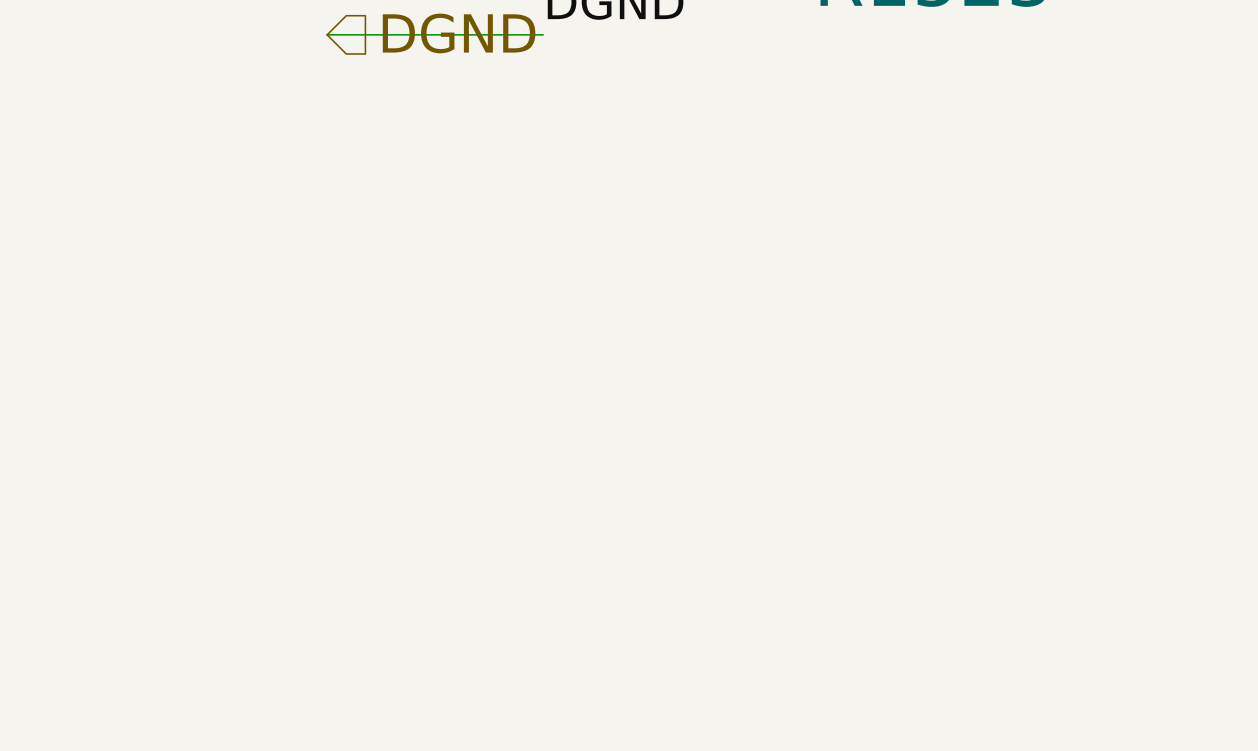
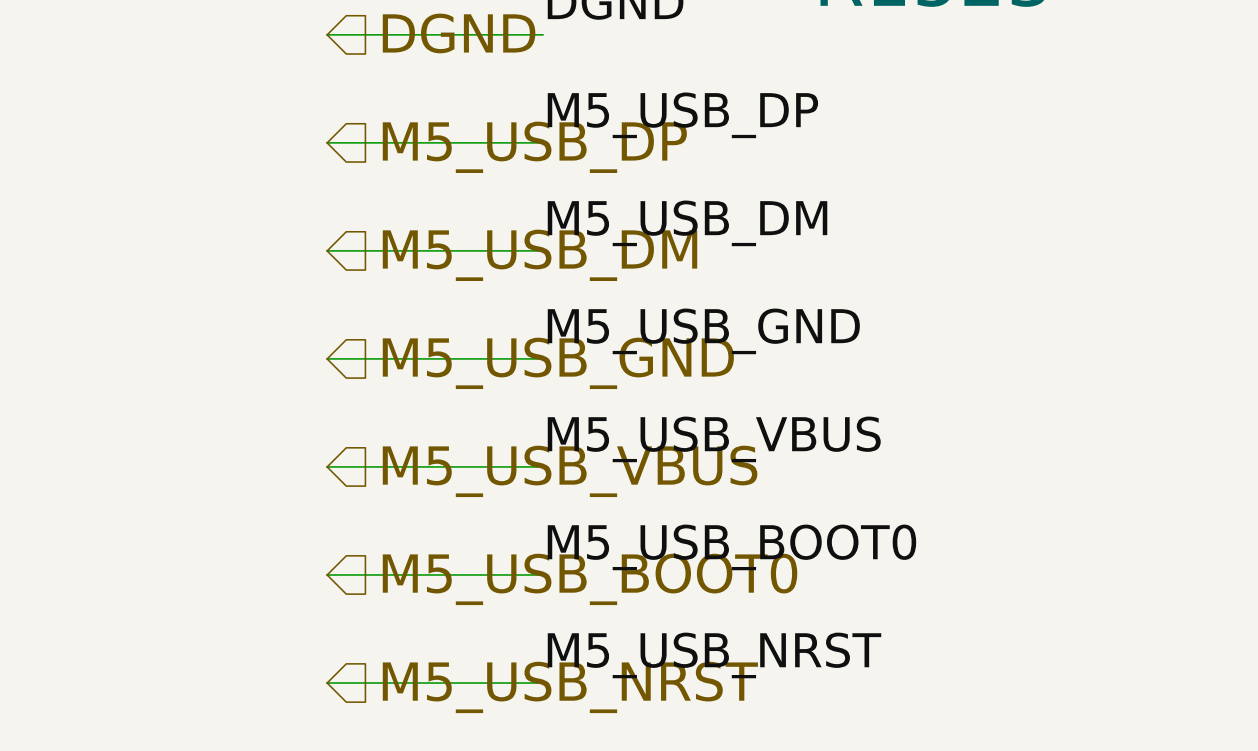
label: none -> M5_USB_DP (682, 115)
wire: none -> (327, 142) (543, 142)
hierarchical label: none -> M5_USB_DP (534, 147)
label: none -> M5_USB_DM (687, 223)
wire: none -> (327, 250) (543, 250)
hierarchical label: none -> M5_USB_DM (540, 255)
label: none -> M5_USB_GND (703, 331)
wire: none -> (327, 358) (543, 358)
hierarchical label: none -> M5_USB_GND (558, 363)
label: none -> M5_USB_VBUS (714, 439)
wire: none -> (327, 466) (543, 466)
hierarchical label: none -> M5_USB_VBUS (570, 471)
label: none -> M5_USB_BOOT0 (731, 547)
wire: none -> (327, 574) (543, 574)
hierarchical label: none -> M5_USB_BOOT0 (590, 579)
label: none -> M5_USB_NRST (714, 655)
wire: none -> (327, 683) (543, 683)
hierarchical label: none -> M5_USB_NRST (570, 687)

